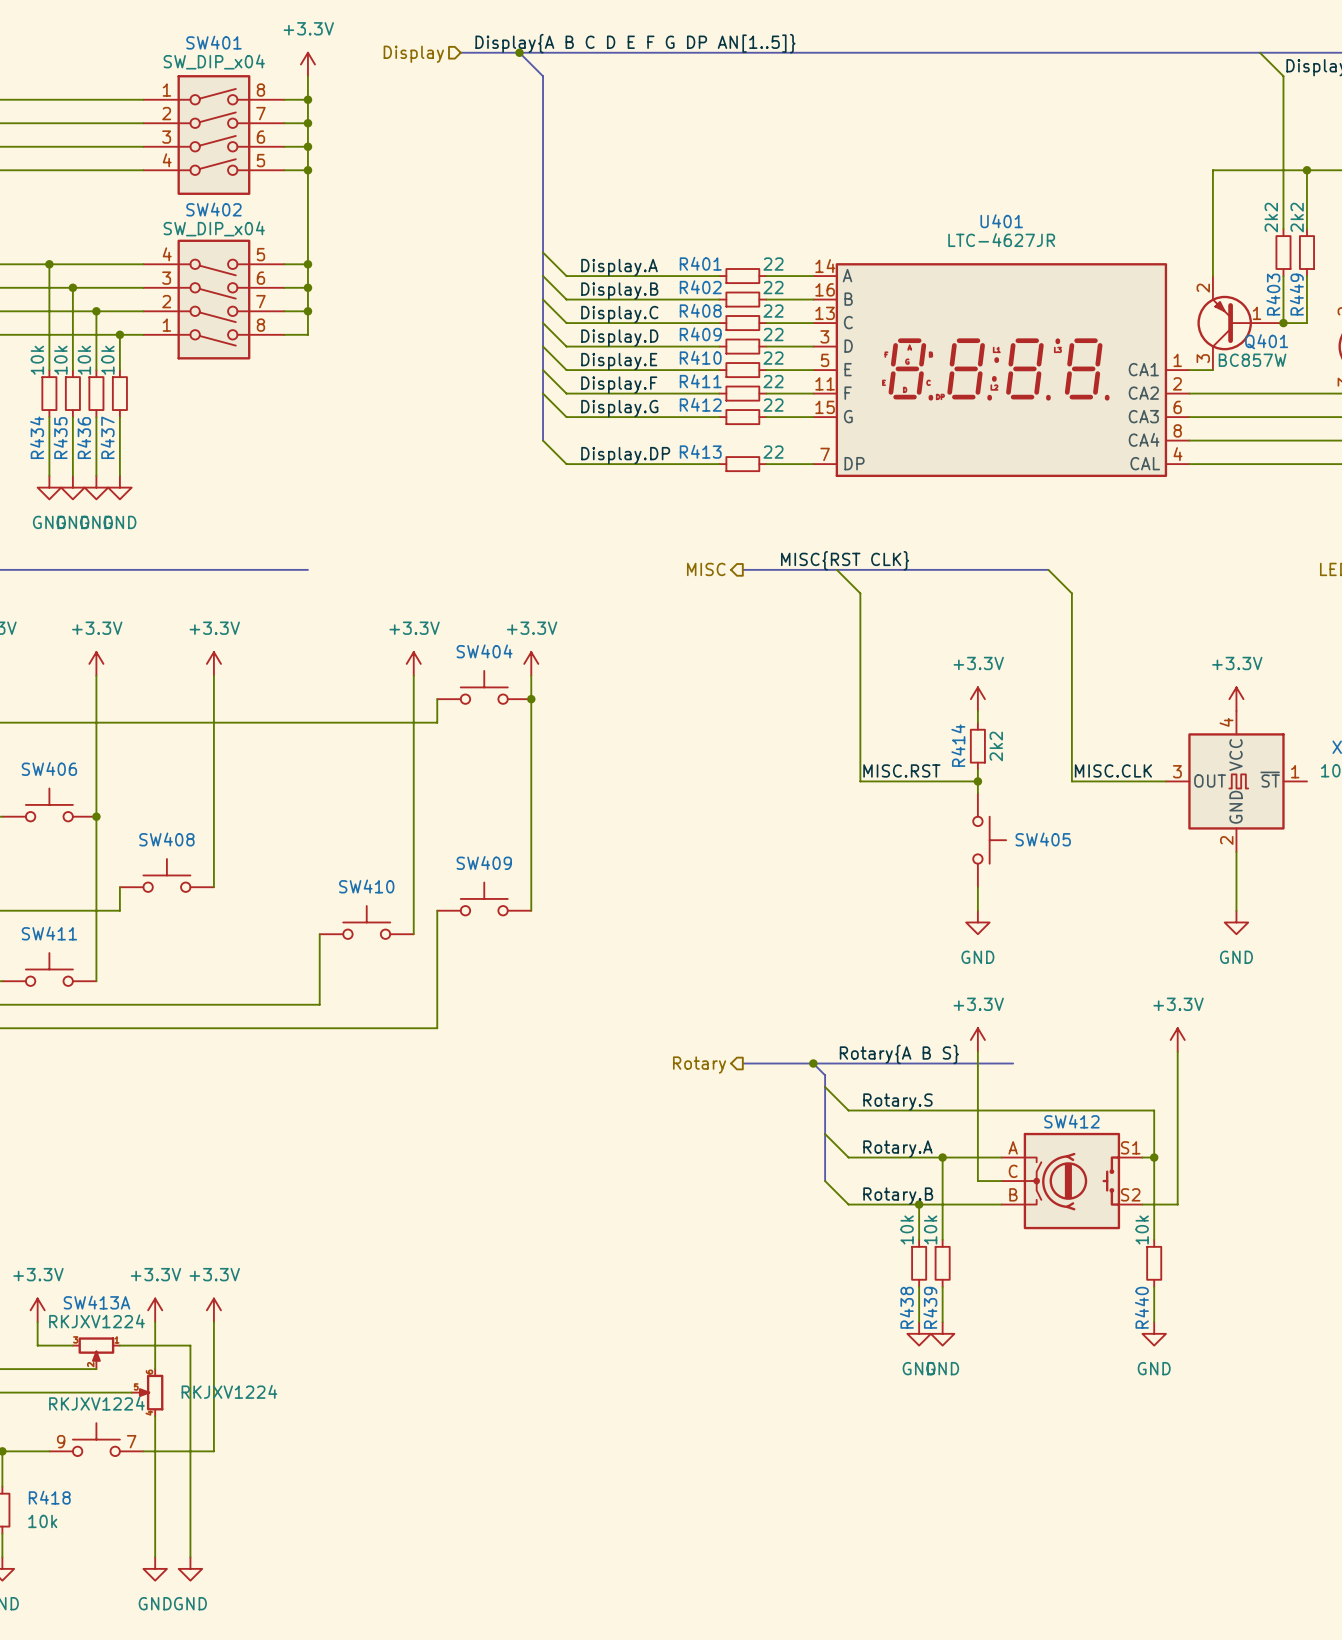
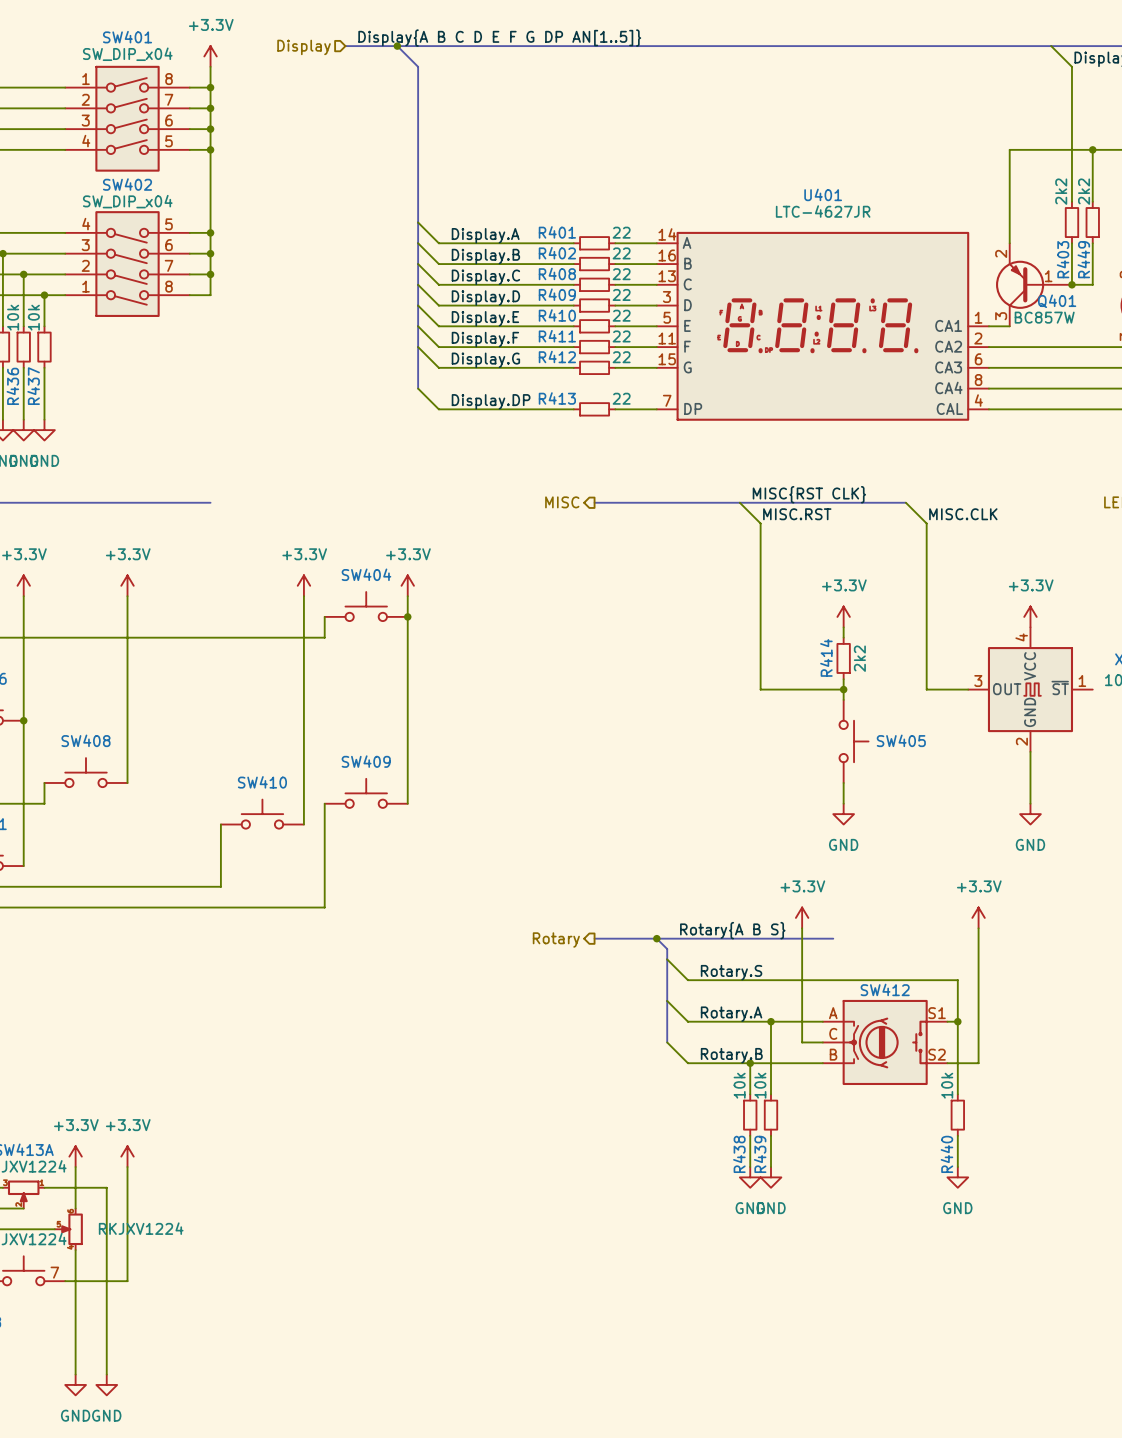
label position: MISC{RST CLK} (845, 560) -> MISC{RST CLK} (809, 494)
wire: (836, 569) (860, 593) (860, 781) (930, 781) -> (739, 502) (760, 523) (760, 689)
wire: (1048, 569) (1071, 593) (1071, 781) (1118, 781) -> (905, 502) (926, 523) (926, 689)
bus: none -> (864, 502) (905, 502)
power symbol position: +3.3V (977, 699) -> +3.3V (843, 616)
wire: (977, 710) (977, 722) -> (843, 627) (843, 637)
R414 position: (977, 746) -> (843, 658)
wire: (977, 769) (977, 793) -> (843, 679) (843, 699)
label position: MISC.RST (901, 770) -> MISC.RST (797, 514)
label position: MISC.CLK (1113, 770) -> MISC.CLK (963, 514)
wire: none -> (802, 689) (843, 689)
junction position: (977, 781) -> (843, 689)
SW405 position: (989, 840) -> (854, 741)
wire: (977, 887) (977, 910) -> (843, 782) (843, 803)
power symbol position: GND (977, 922) -> GND (843, 814)

